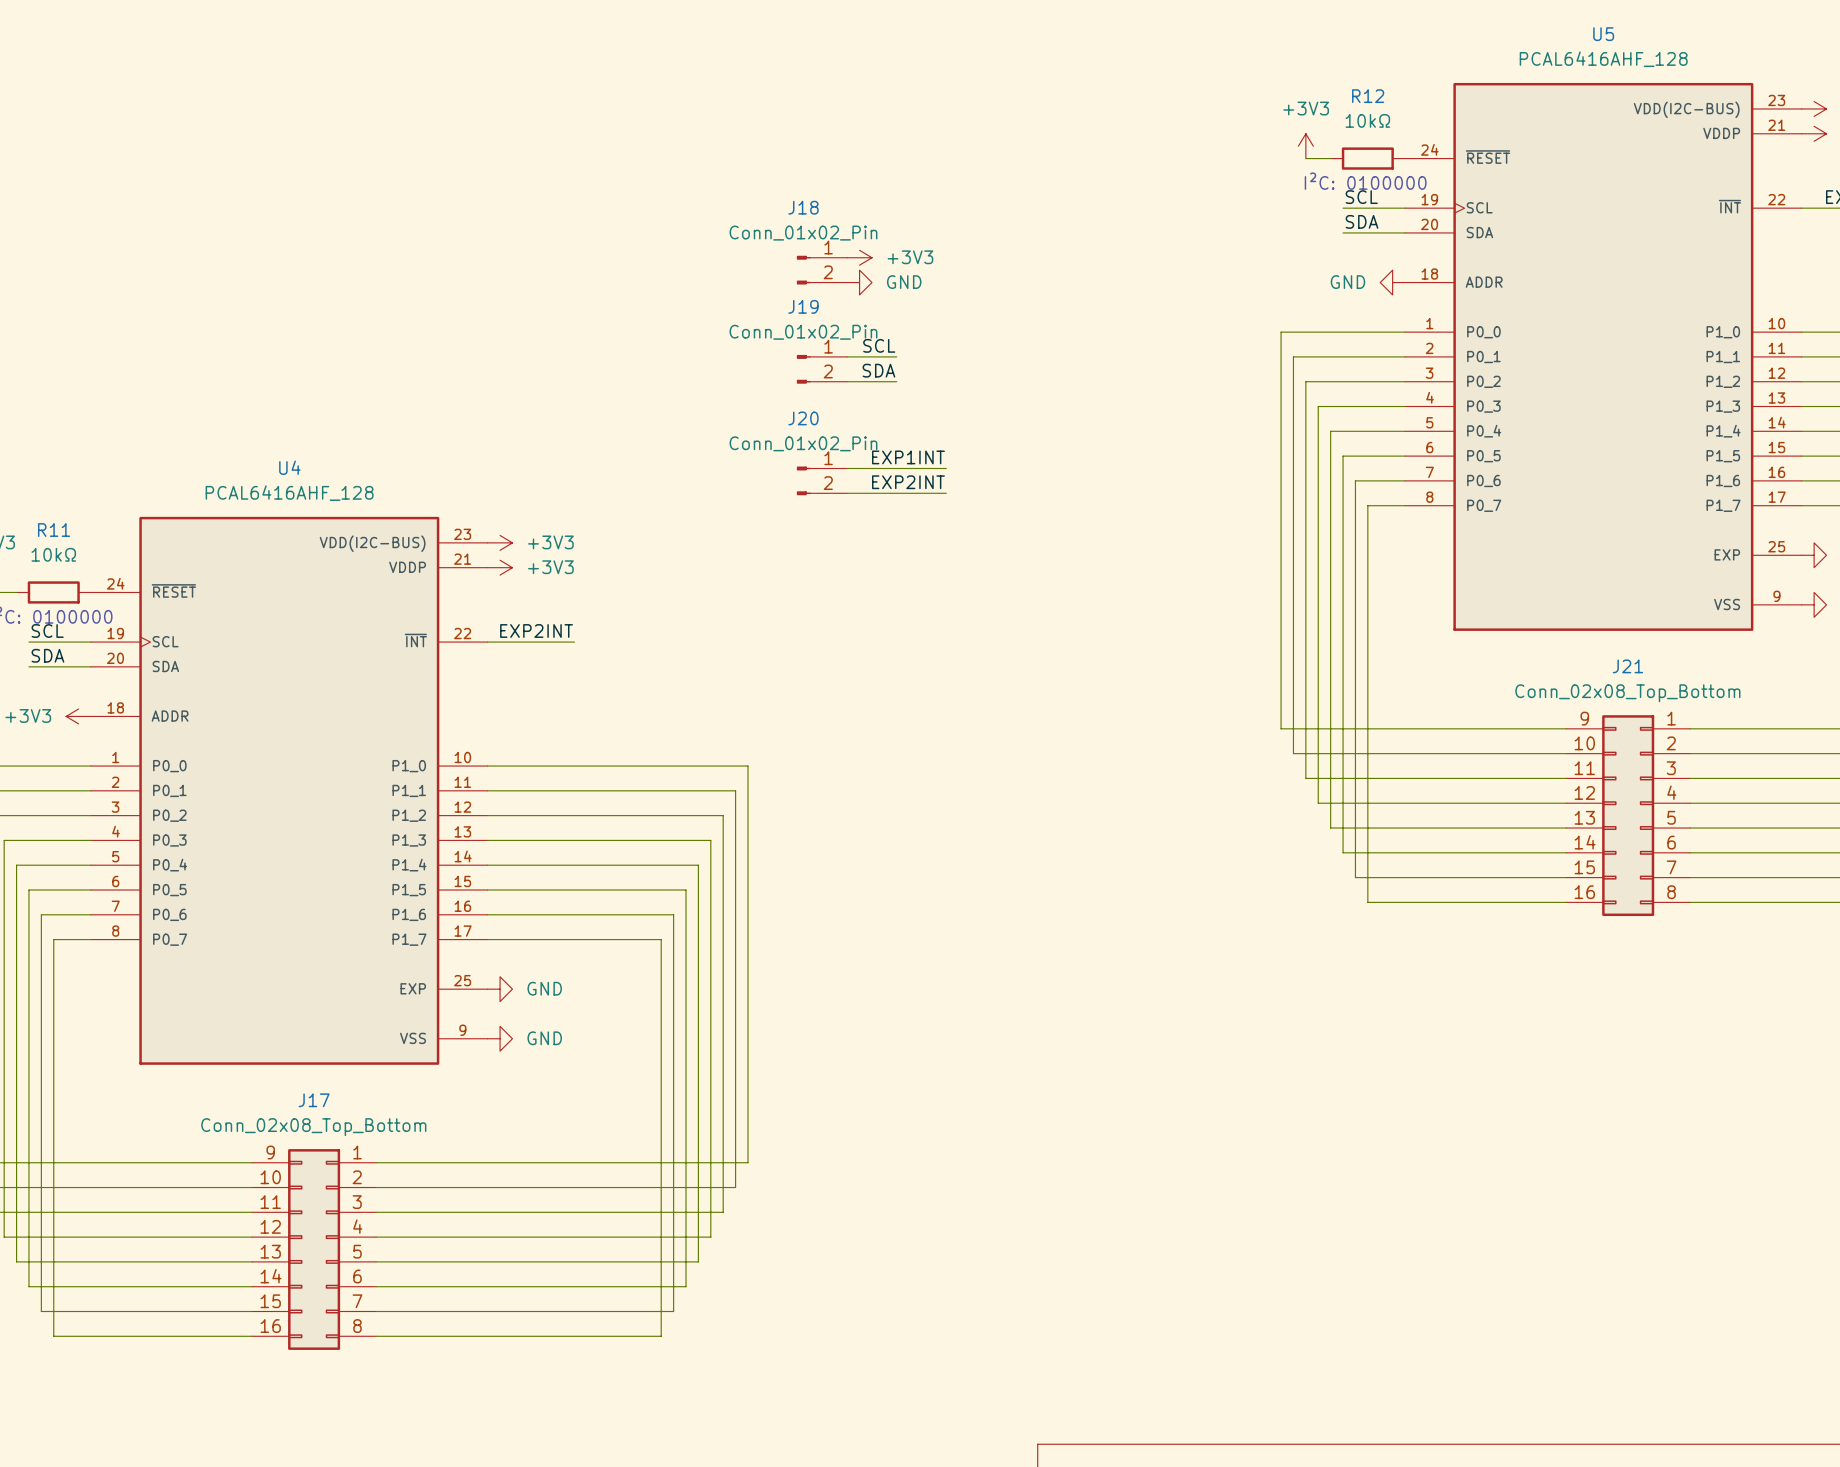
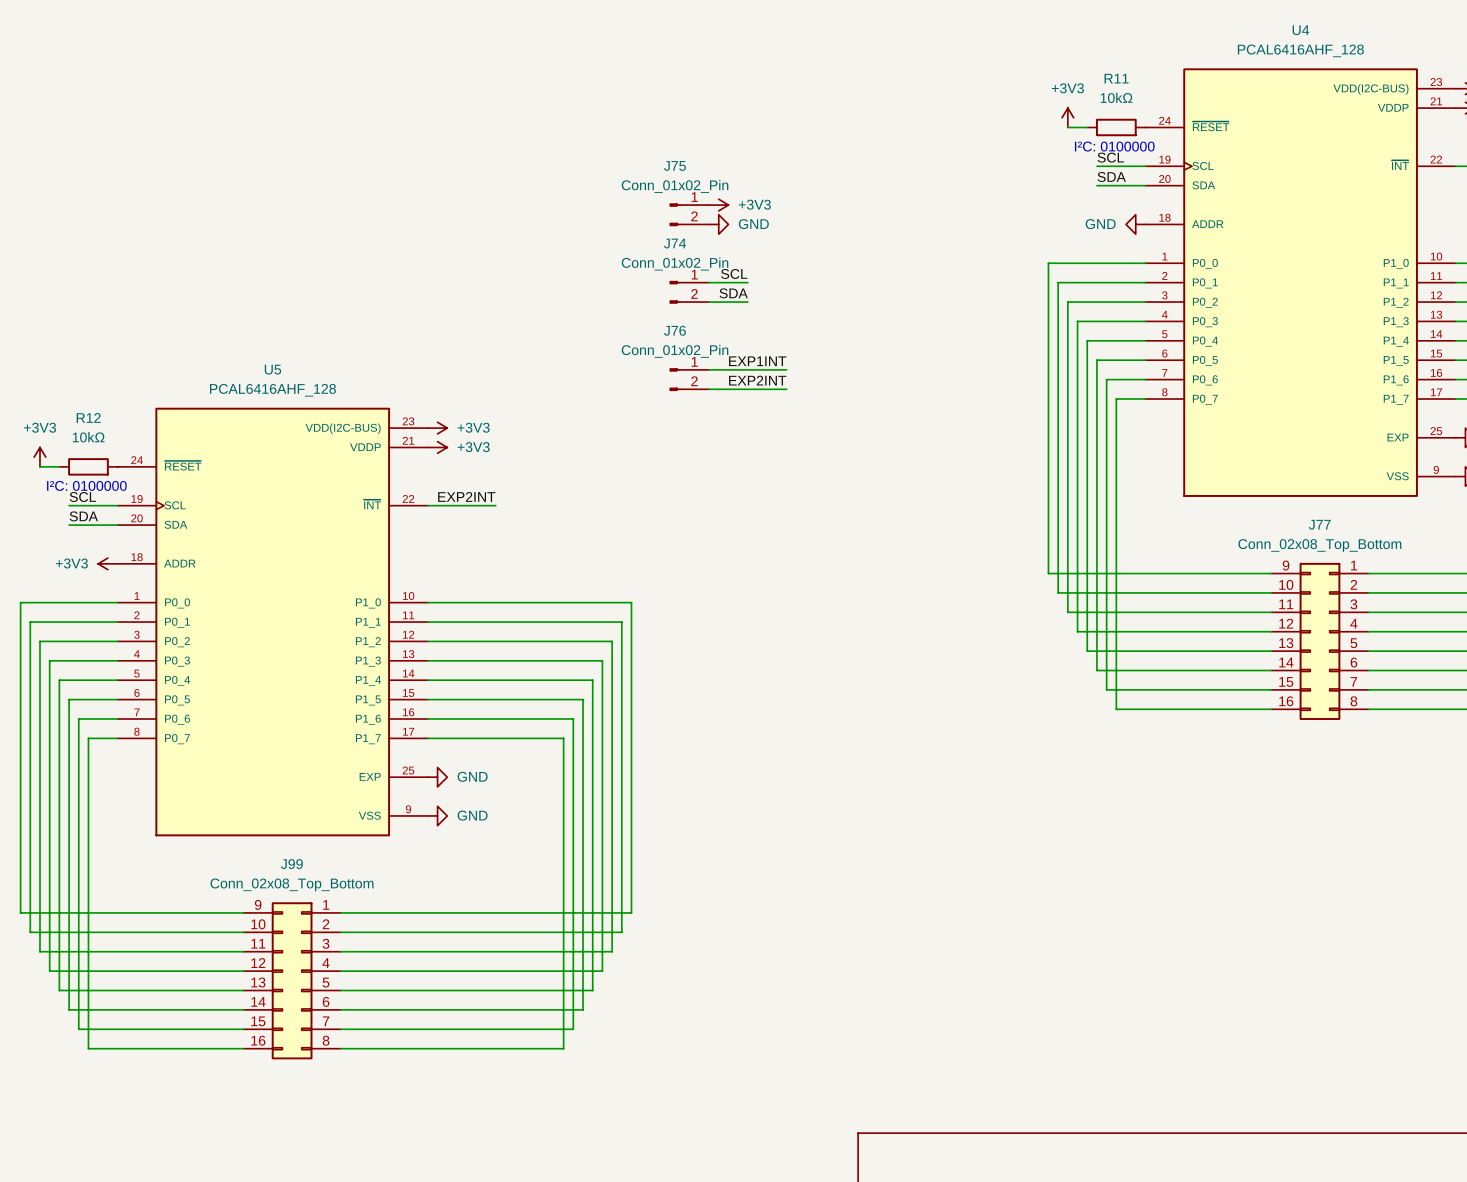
U5 name: U5 (1603, 34) -> U4 (1300, 30)
R12 name: R12 (1368, 96) -> R11 (1116, 78)
J18 name: J18 (803, 207) -> J75 (674, 165)
J19 name: J19 (803, 306) -> J74 (675, 243)
J20 name: J20 (803, 418) -> J76 (674, 330)
U4 name: U4 (289, 467) -> U5 (272, 369)
R11 name: R11 (54, 530) -> R12 (88, 417)
J21 name: J21 (1627, 666) -> J77 (1319, 524)
J17 name: J17 (314, 1100) -> J99 (291, 864)

